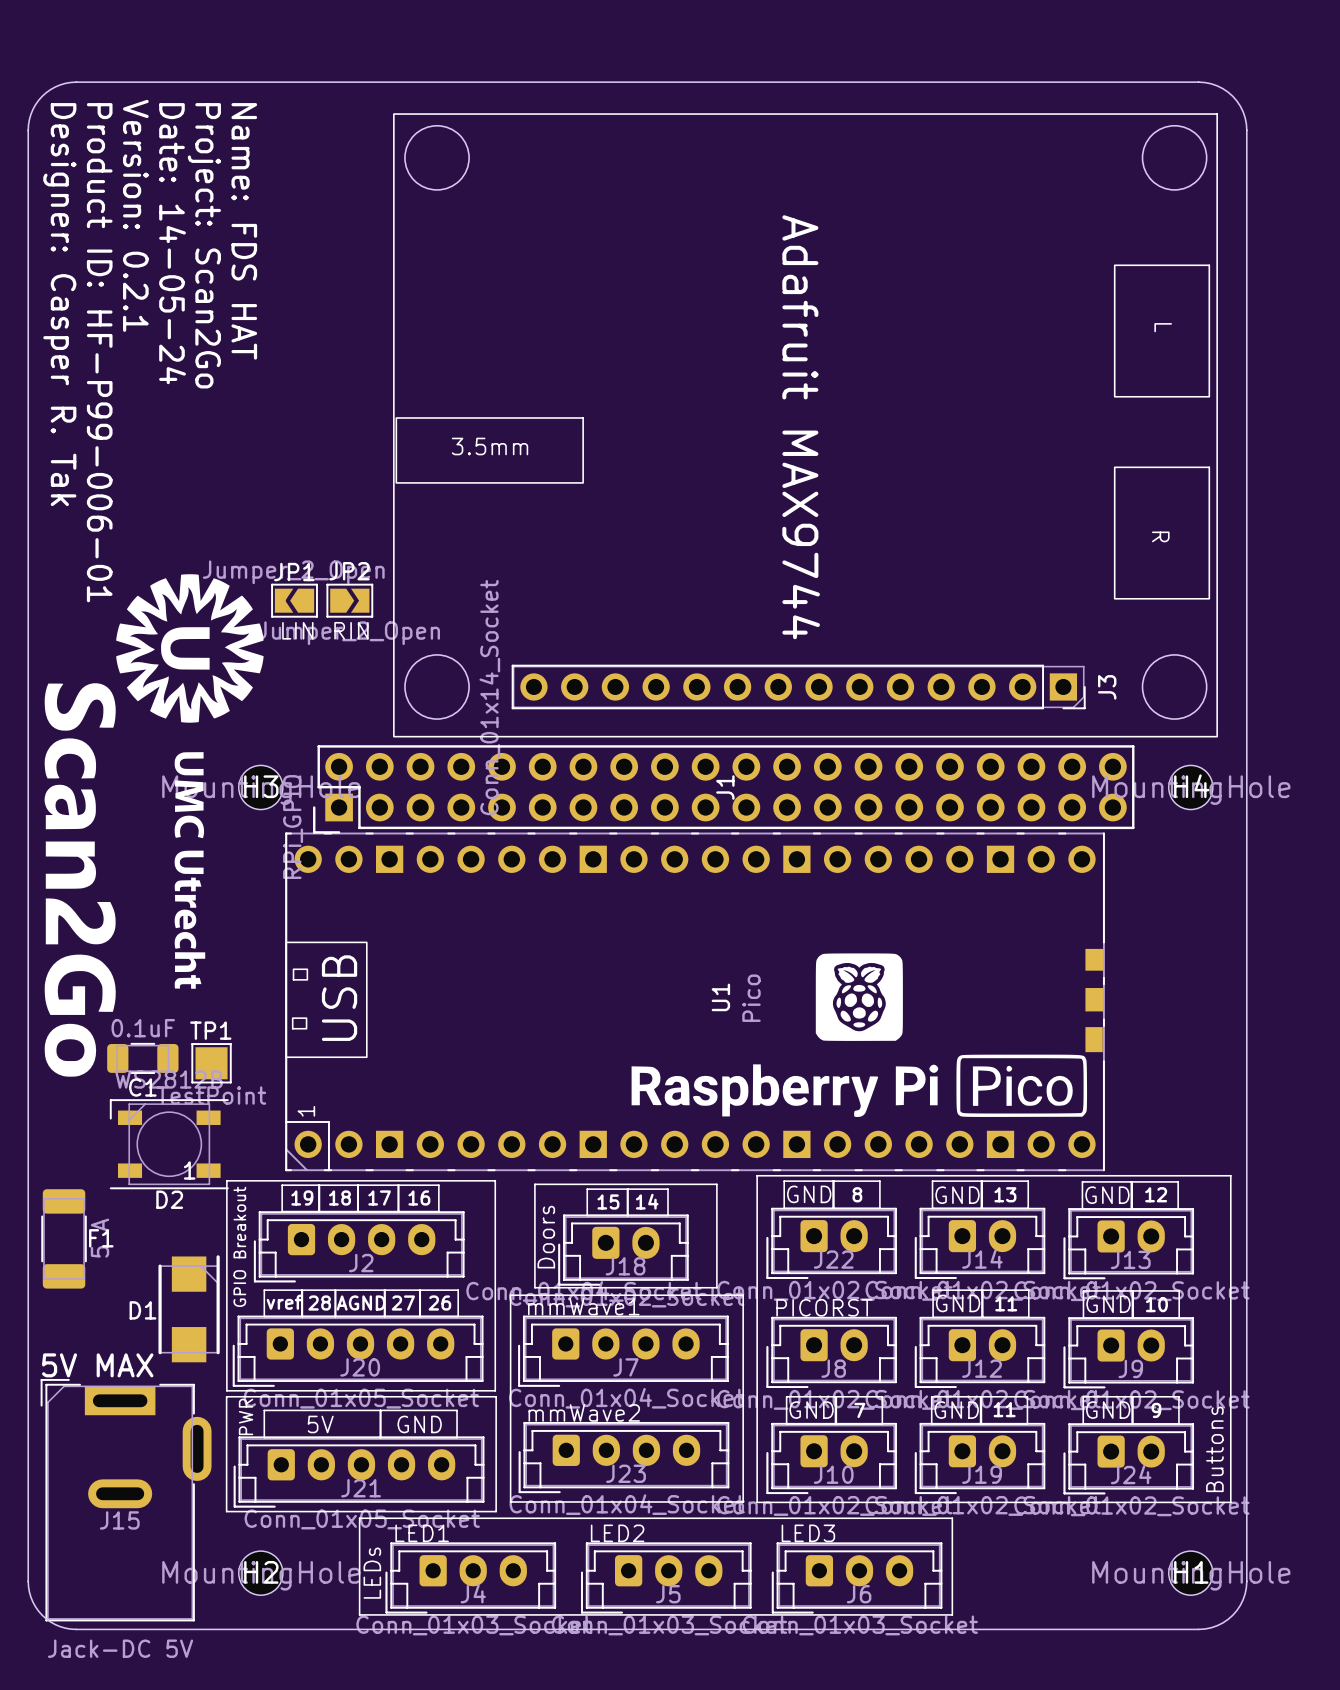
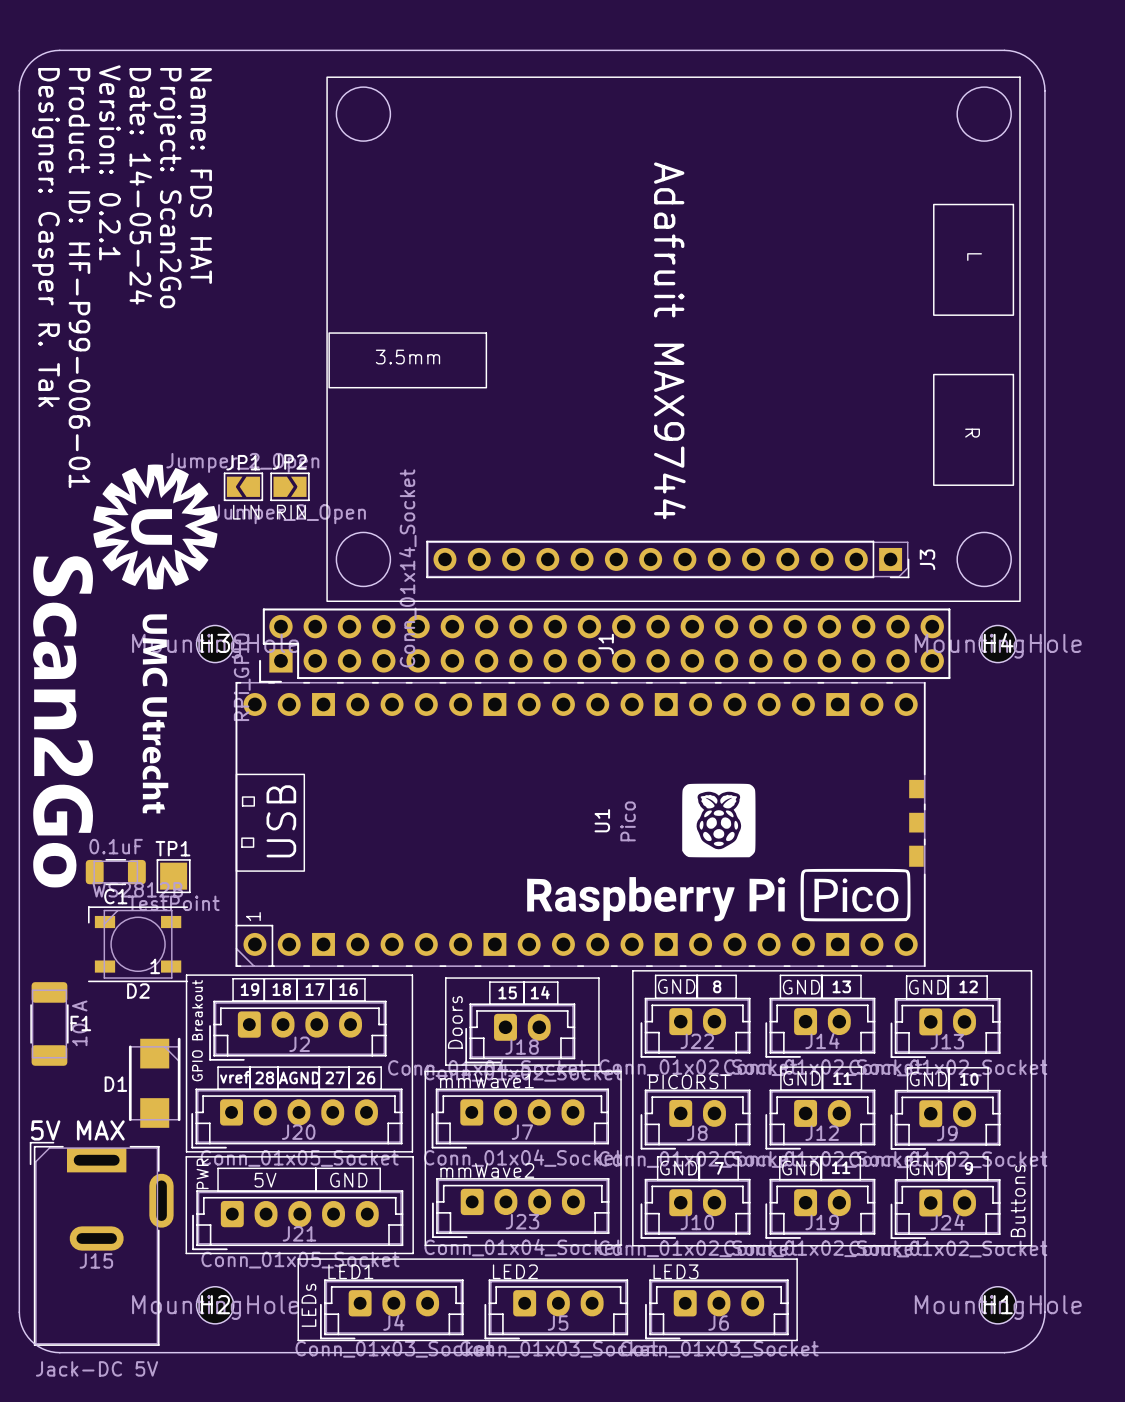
F1 value: 5 A (99, 1238) -> 10 A (79, 1023)

